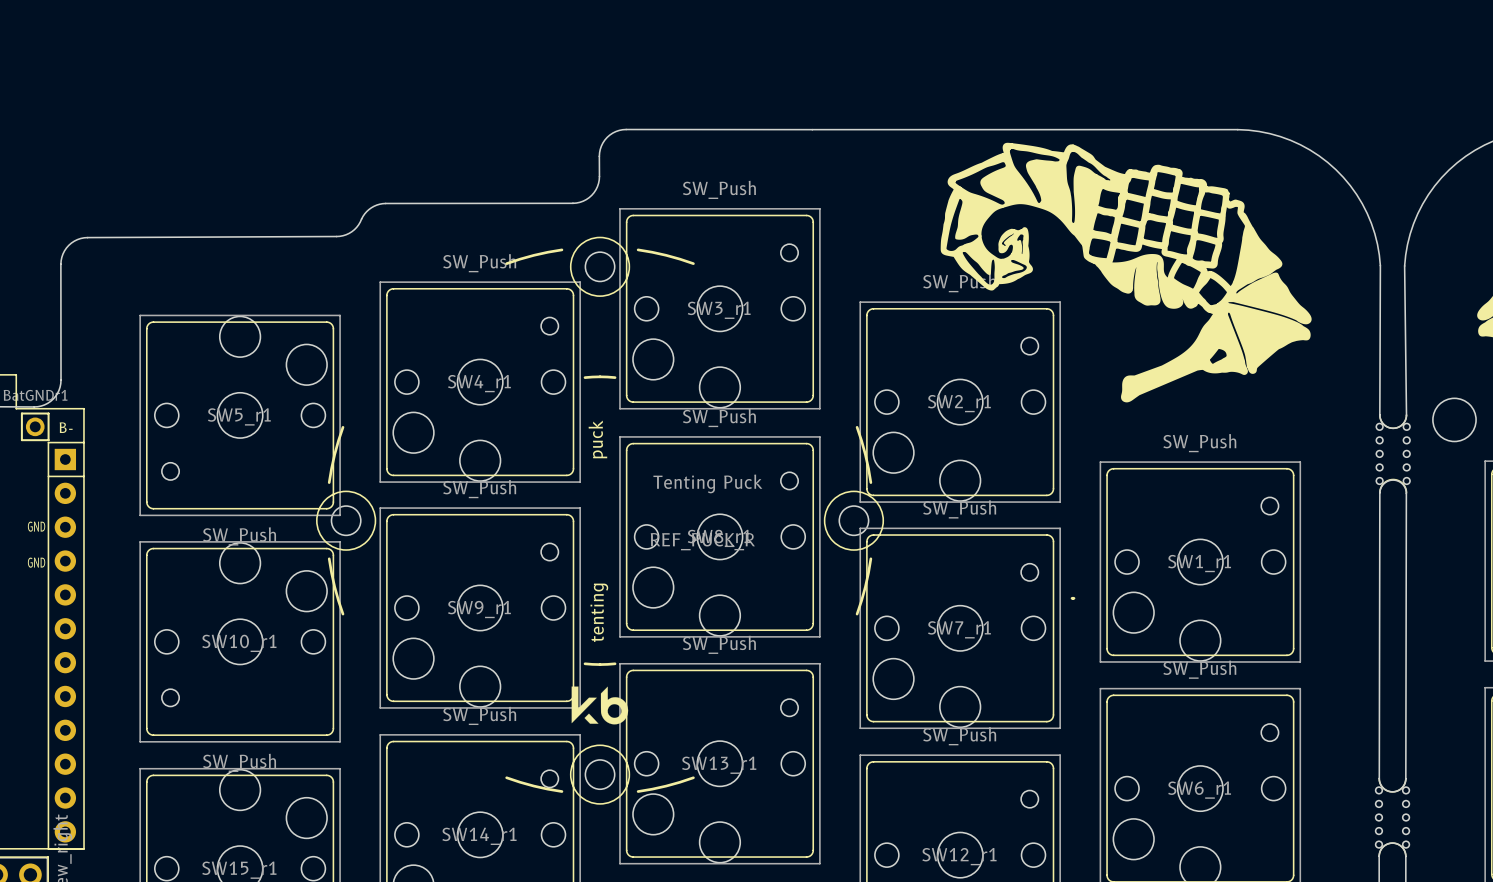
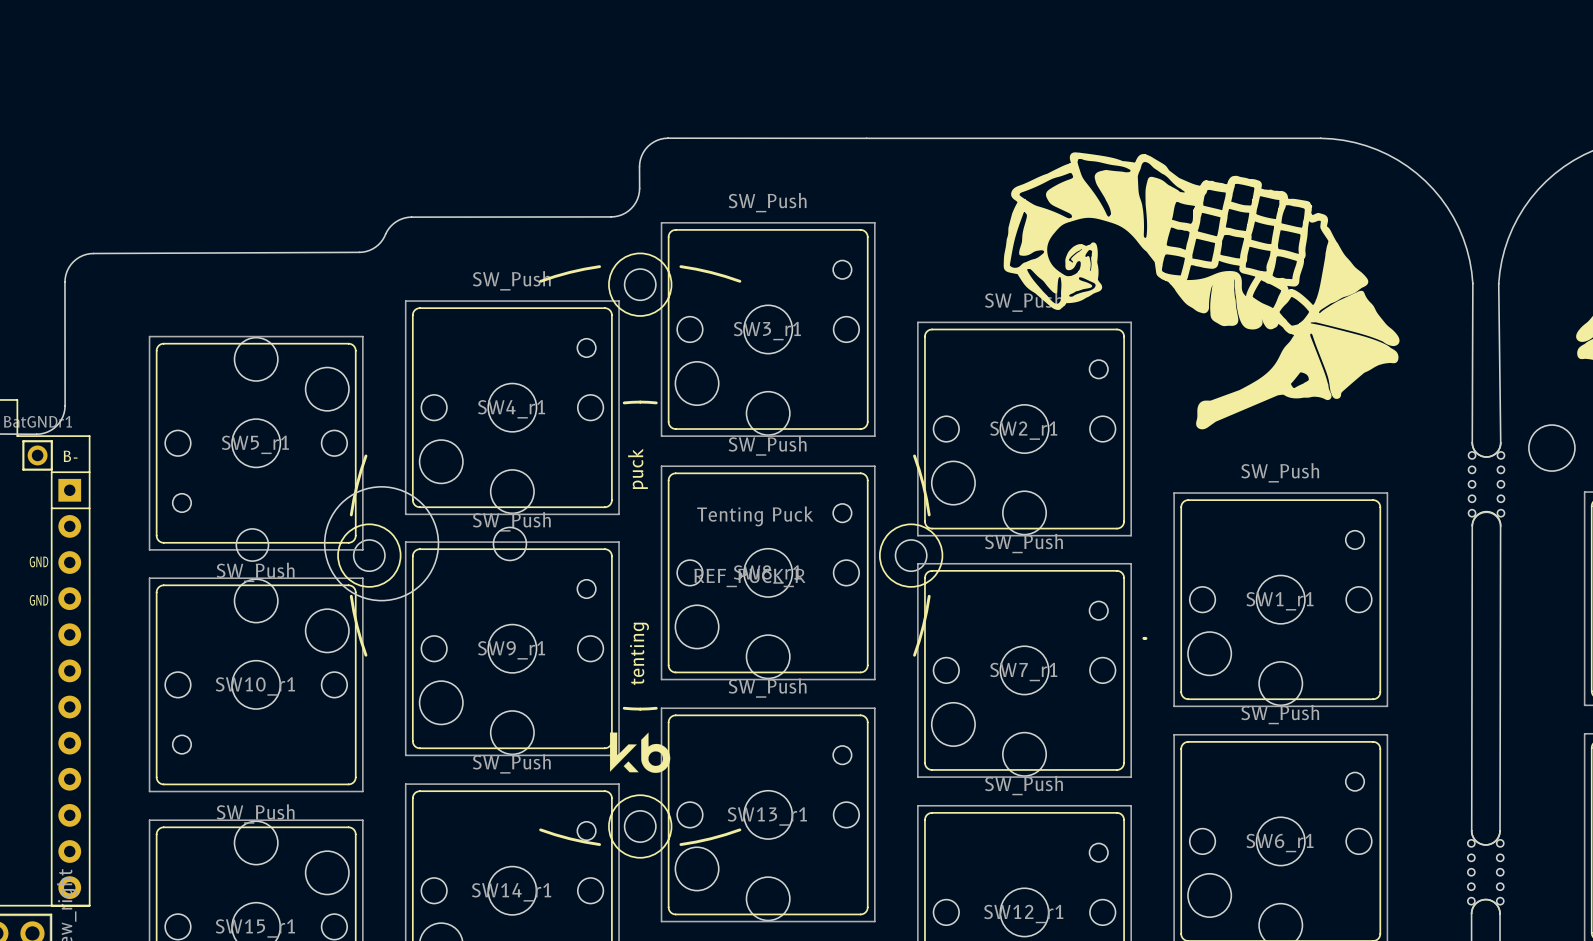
round board edge: none -> [323, 486, 440, 602]
round board edge: none -> [492, 526, 528, 562]
round board edge: none -> [235, 528, 270, 562]

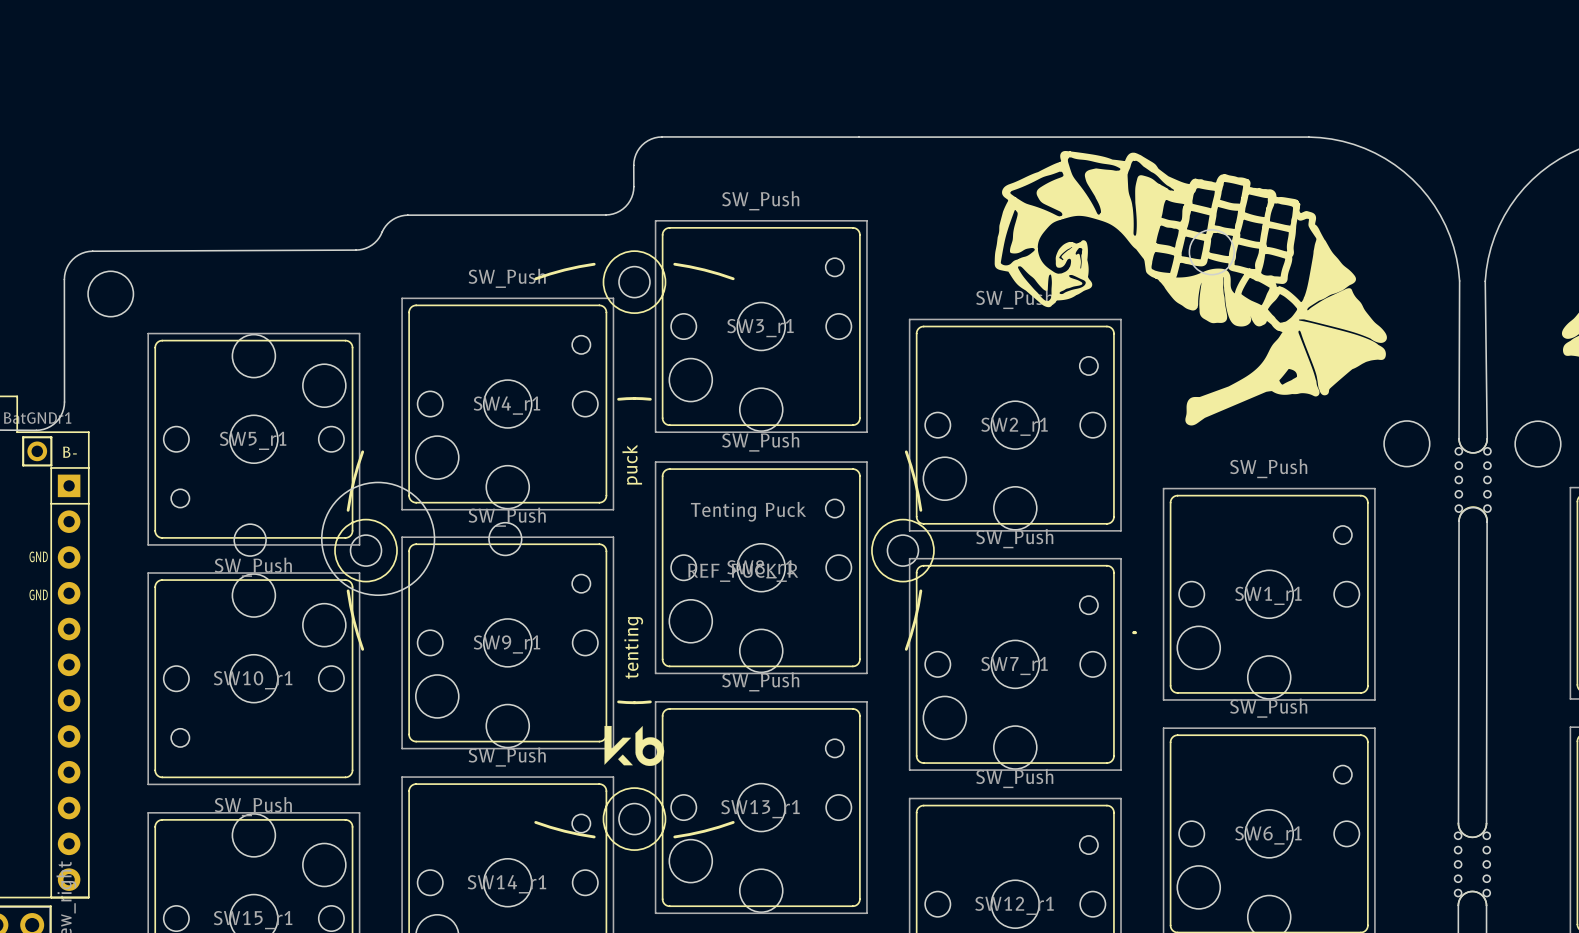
round board edge: none -> [1188, 229, 1235, 276]
round board edge: none -> [87, 270, 135, 318]
round board edge: none -> [1383, 420, 1431, 468]

